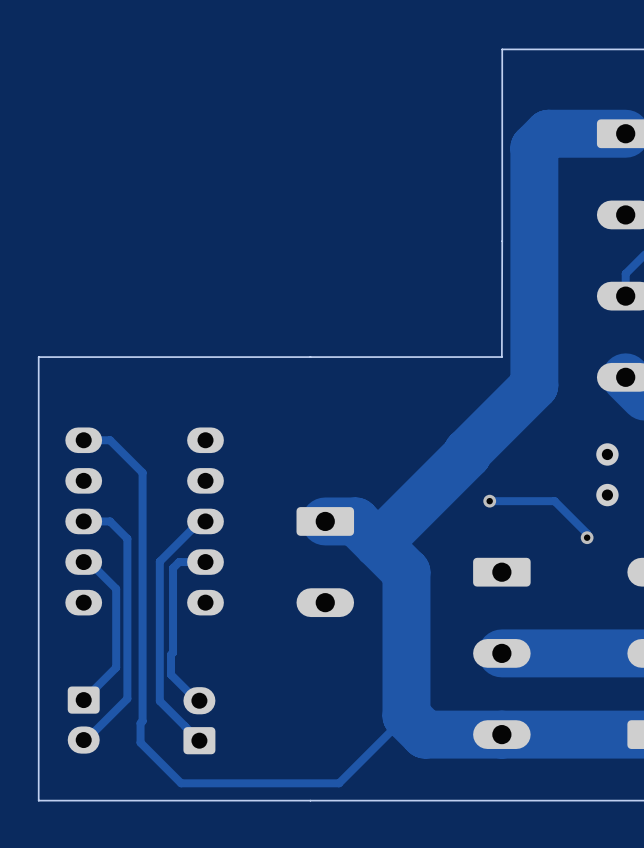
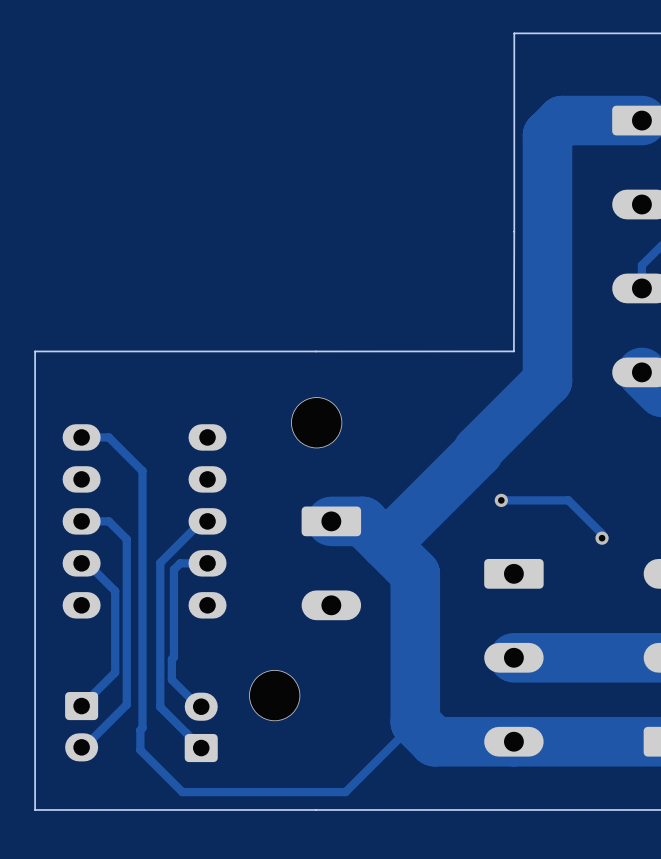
via: none -> (316, 422)
part: (607, 474) -> none
via: none -> (274, 695)

